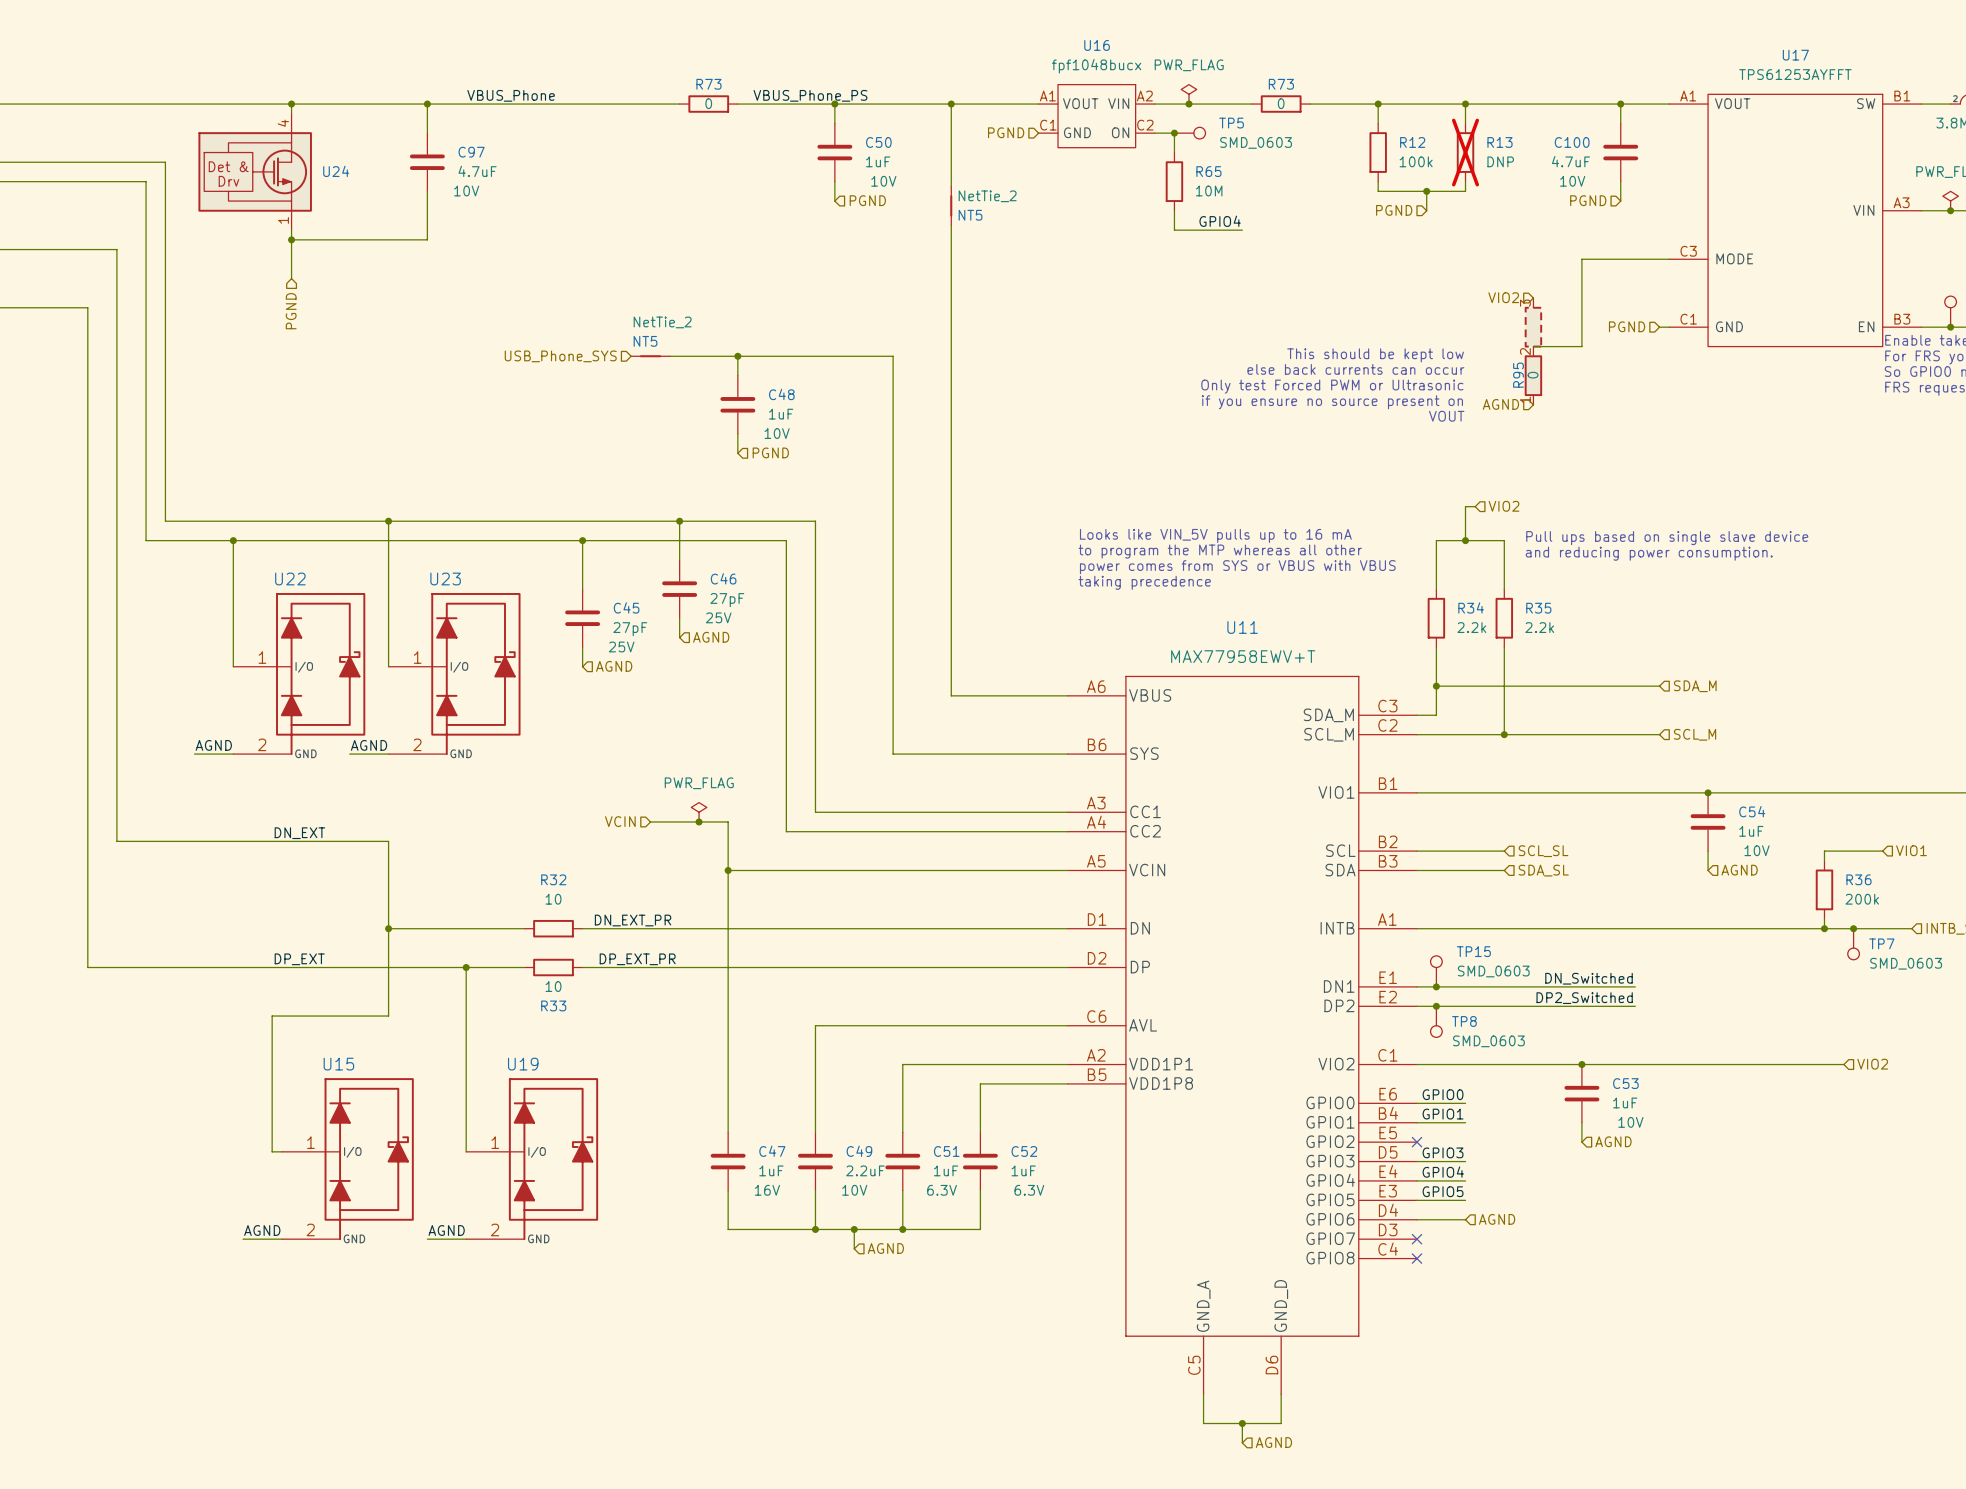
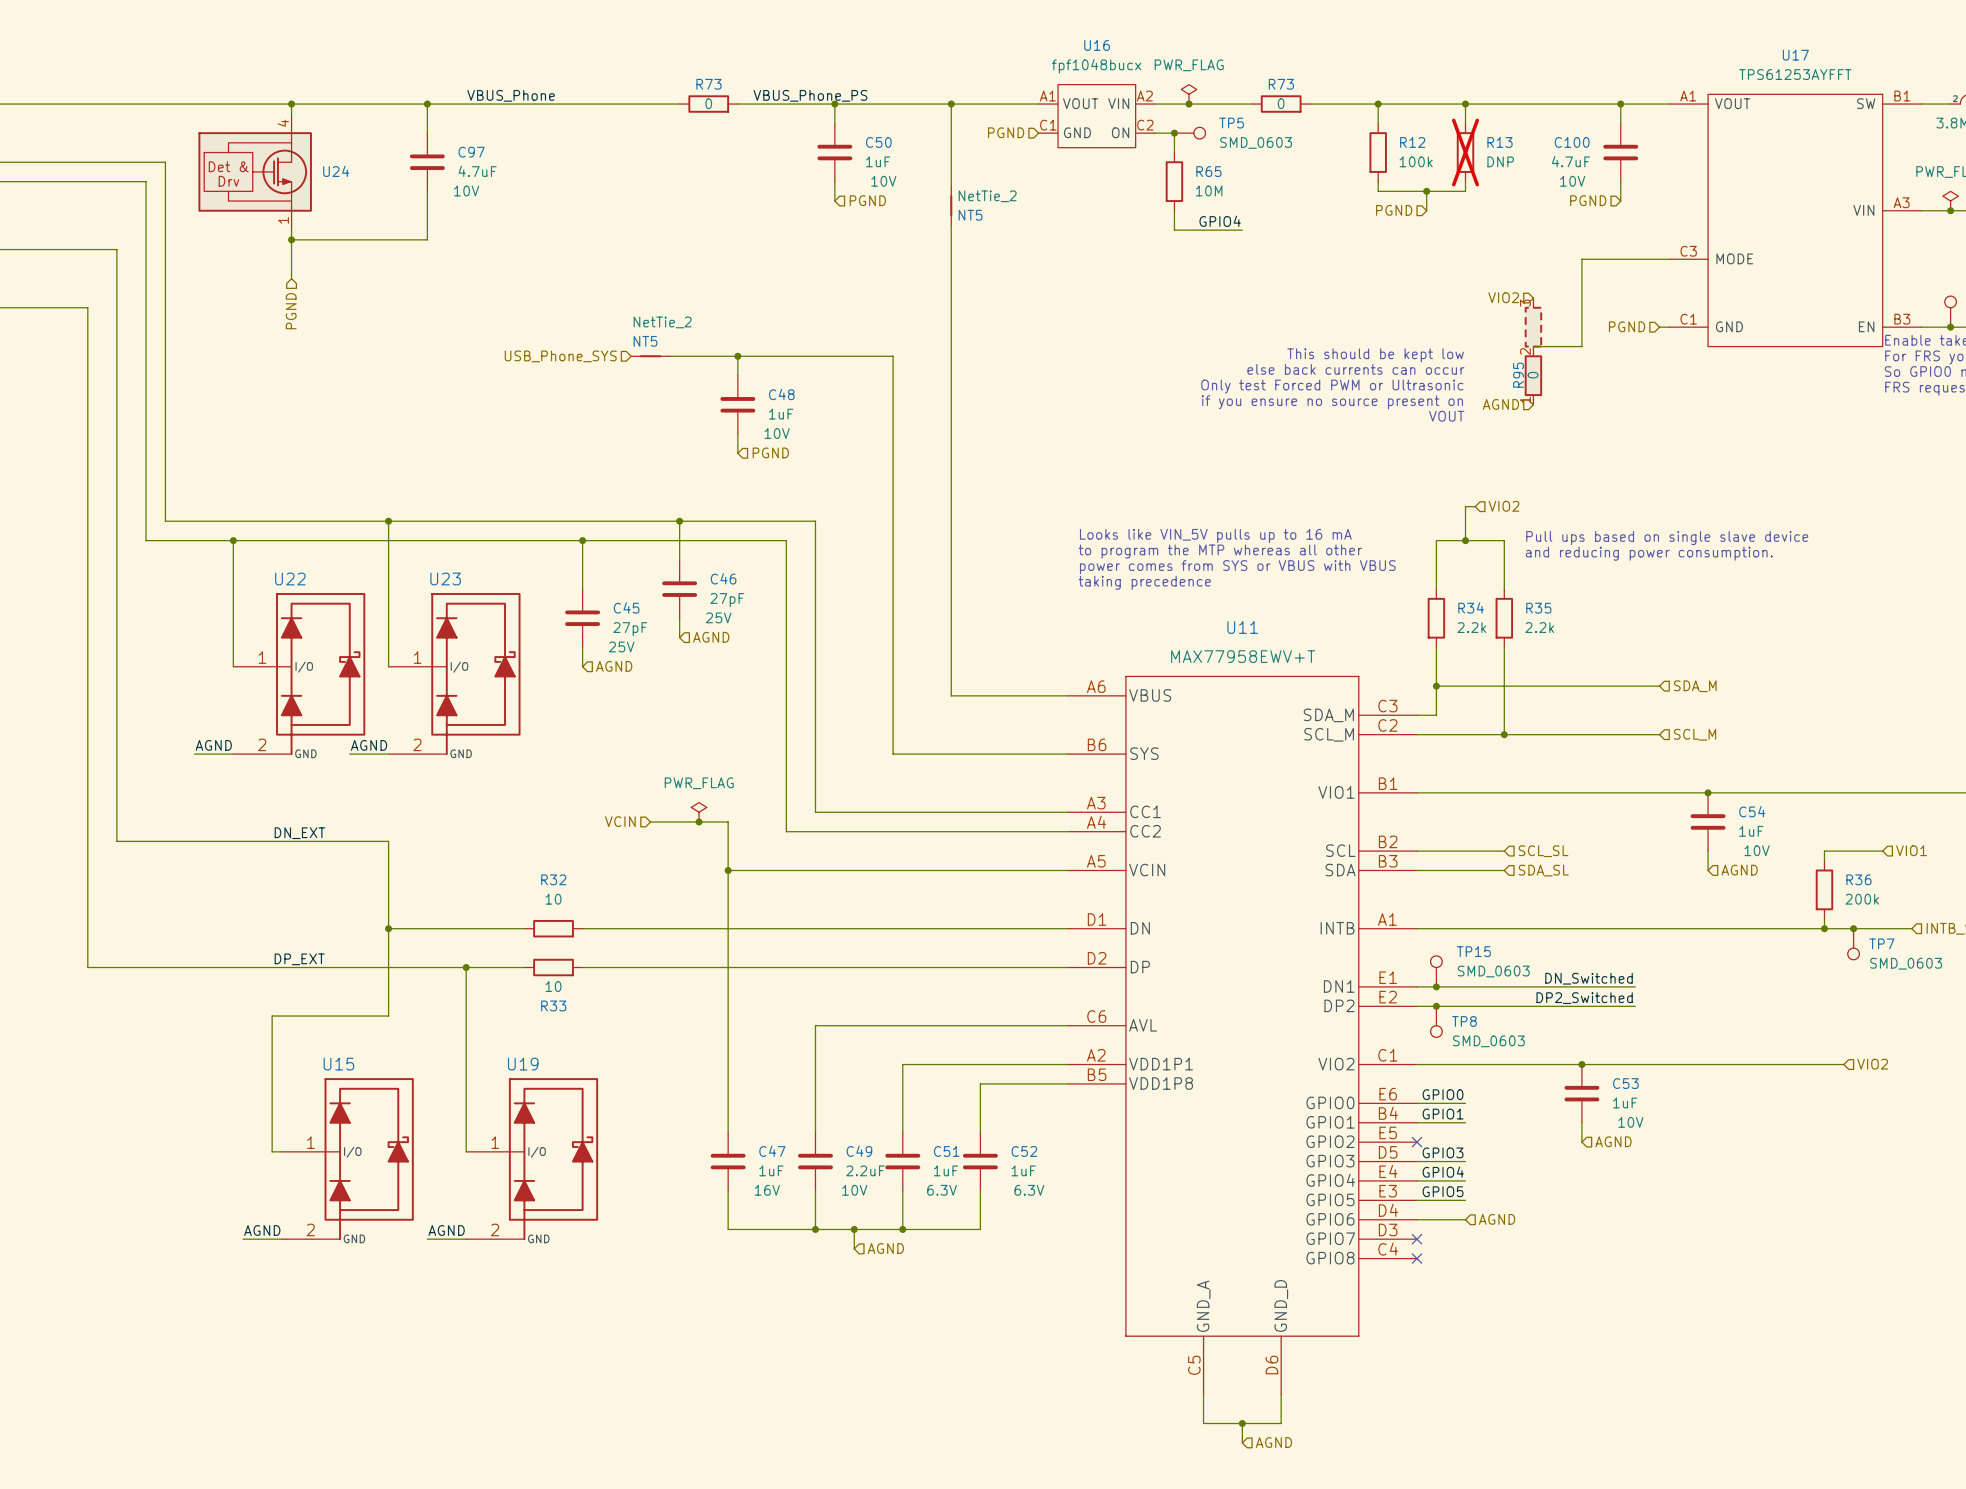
label: DN_EXT_PR (633, 920) -> none
label: DP_EXT_PR (637, 959) -> none

